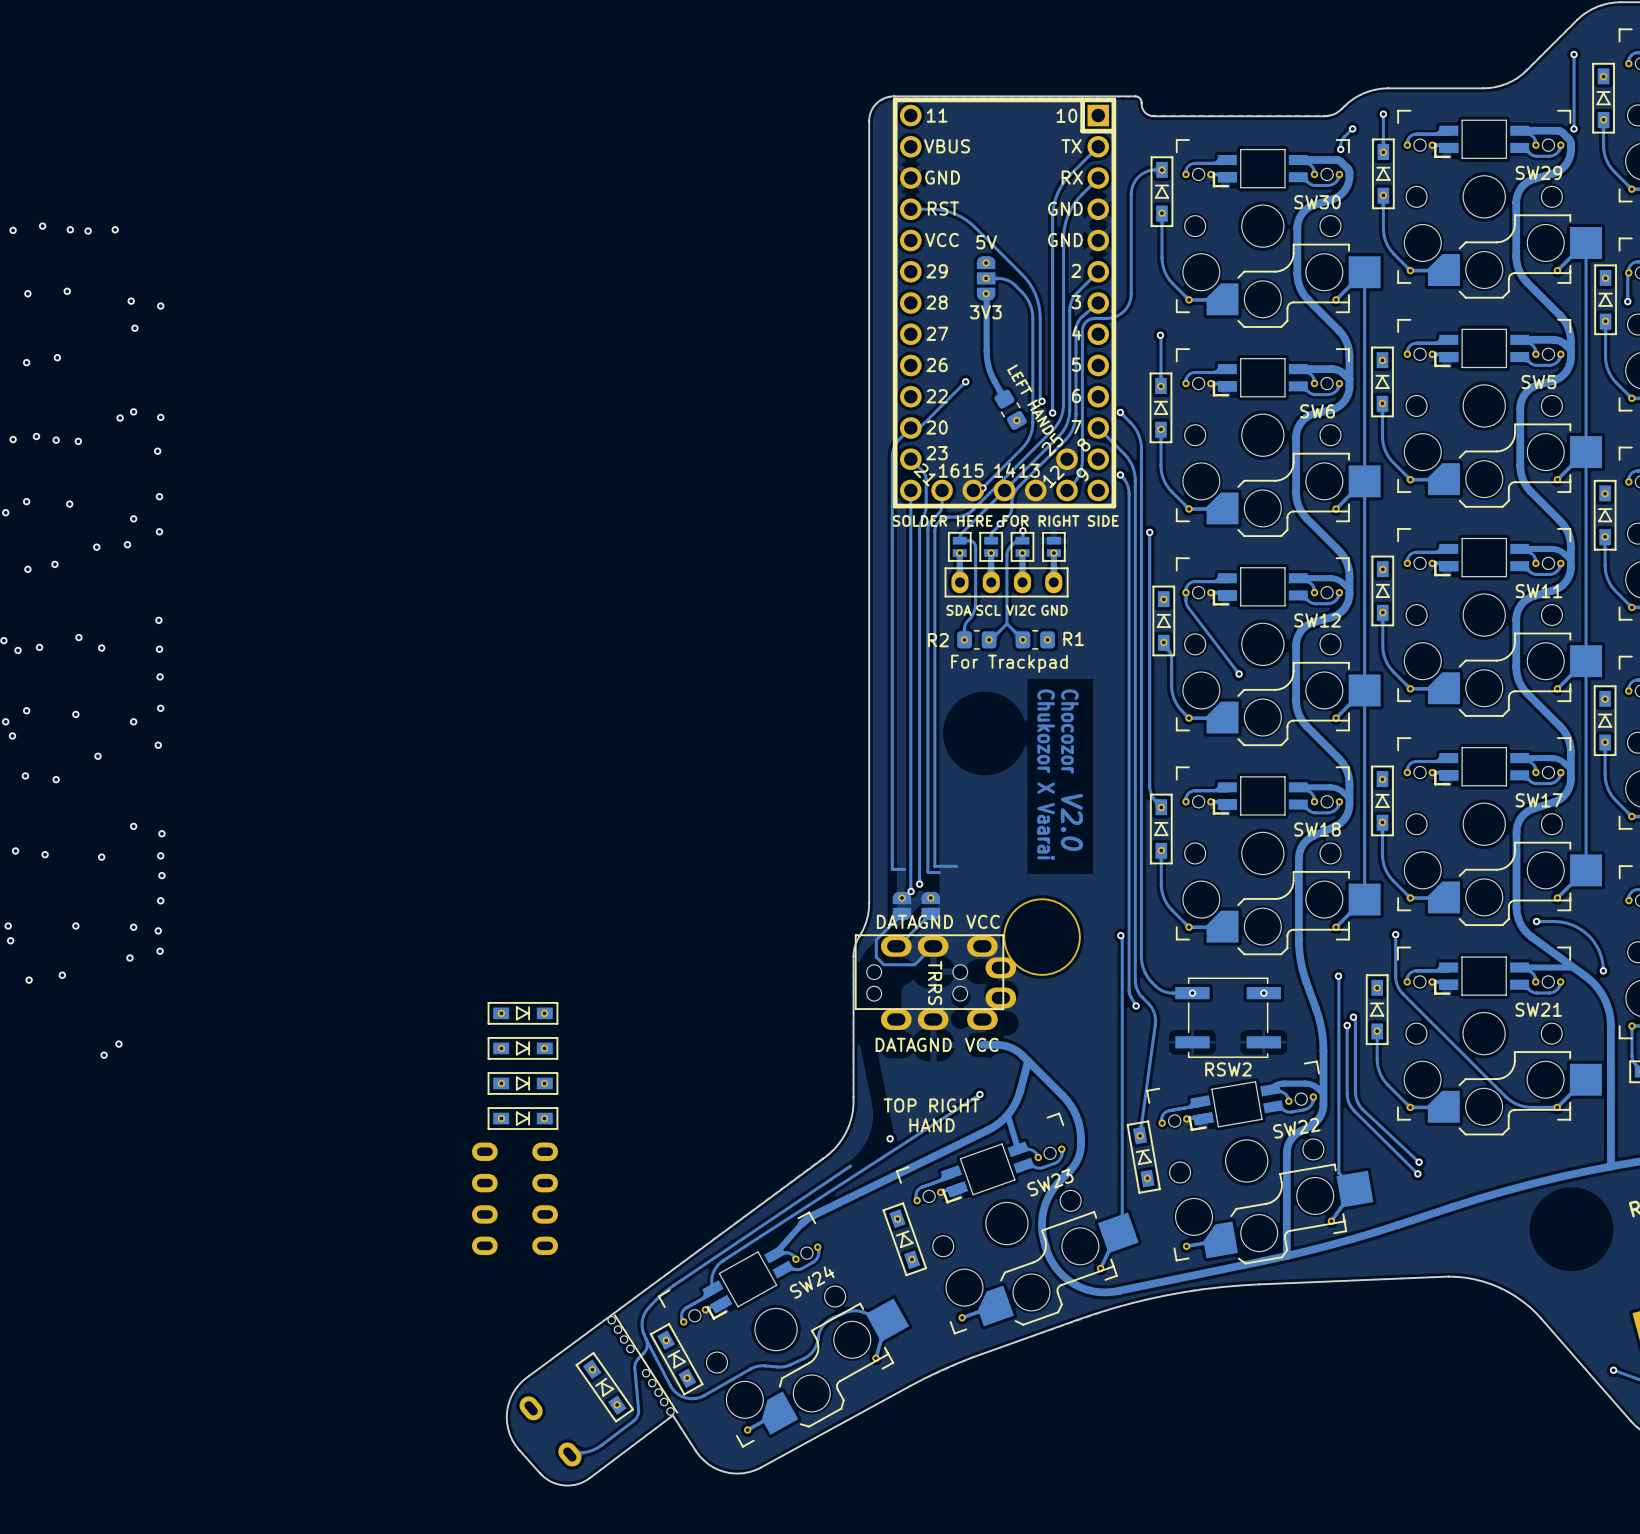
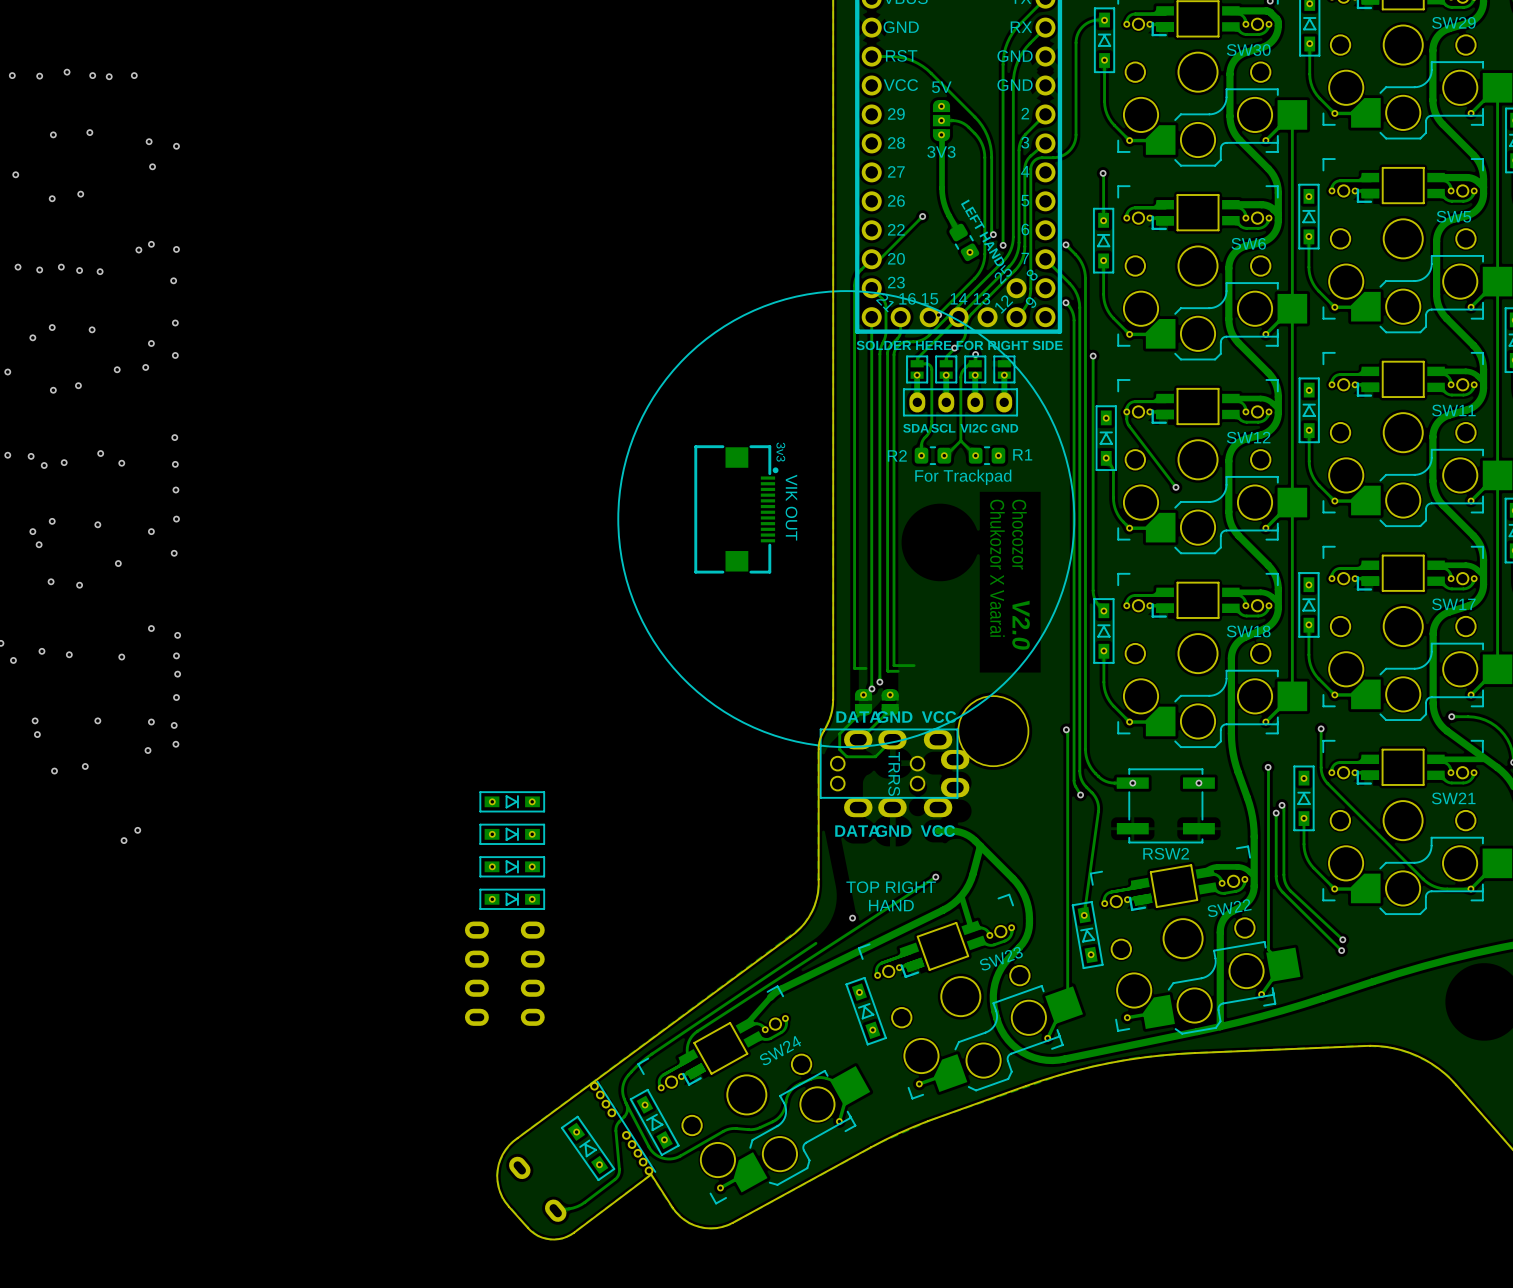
drawing: none -> [617, 290, 1075, 748]
part: none -> (736, 509)

